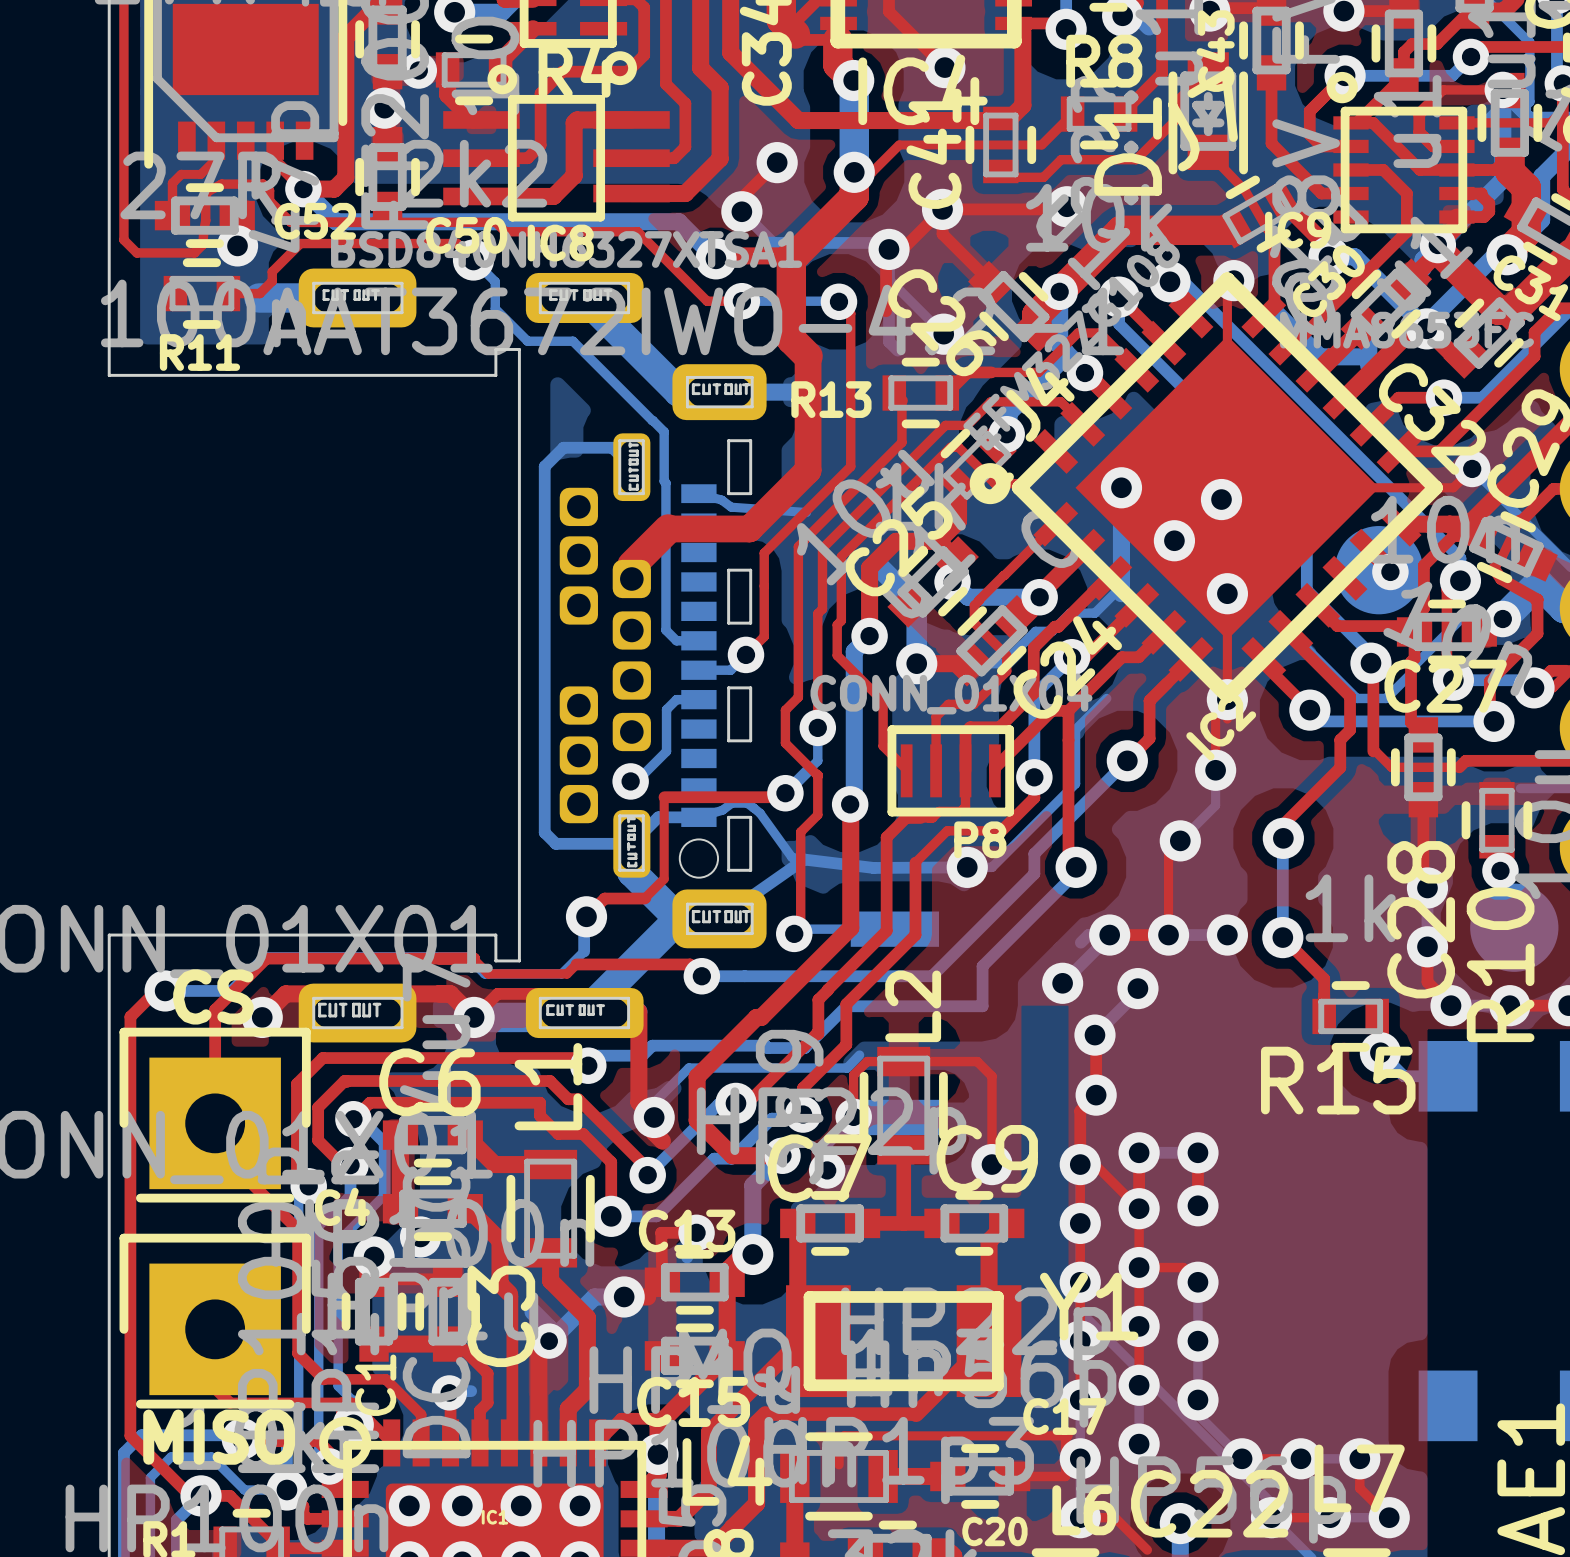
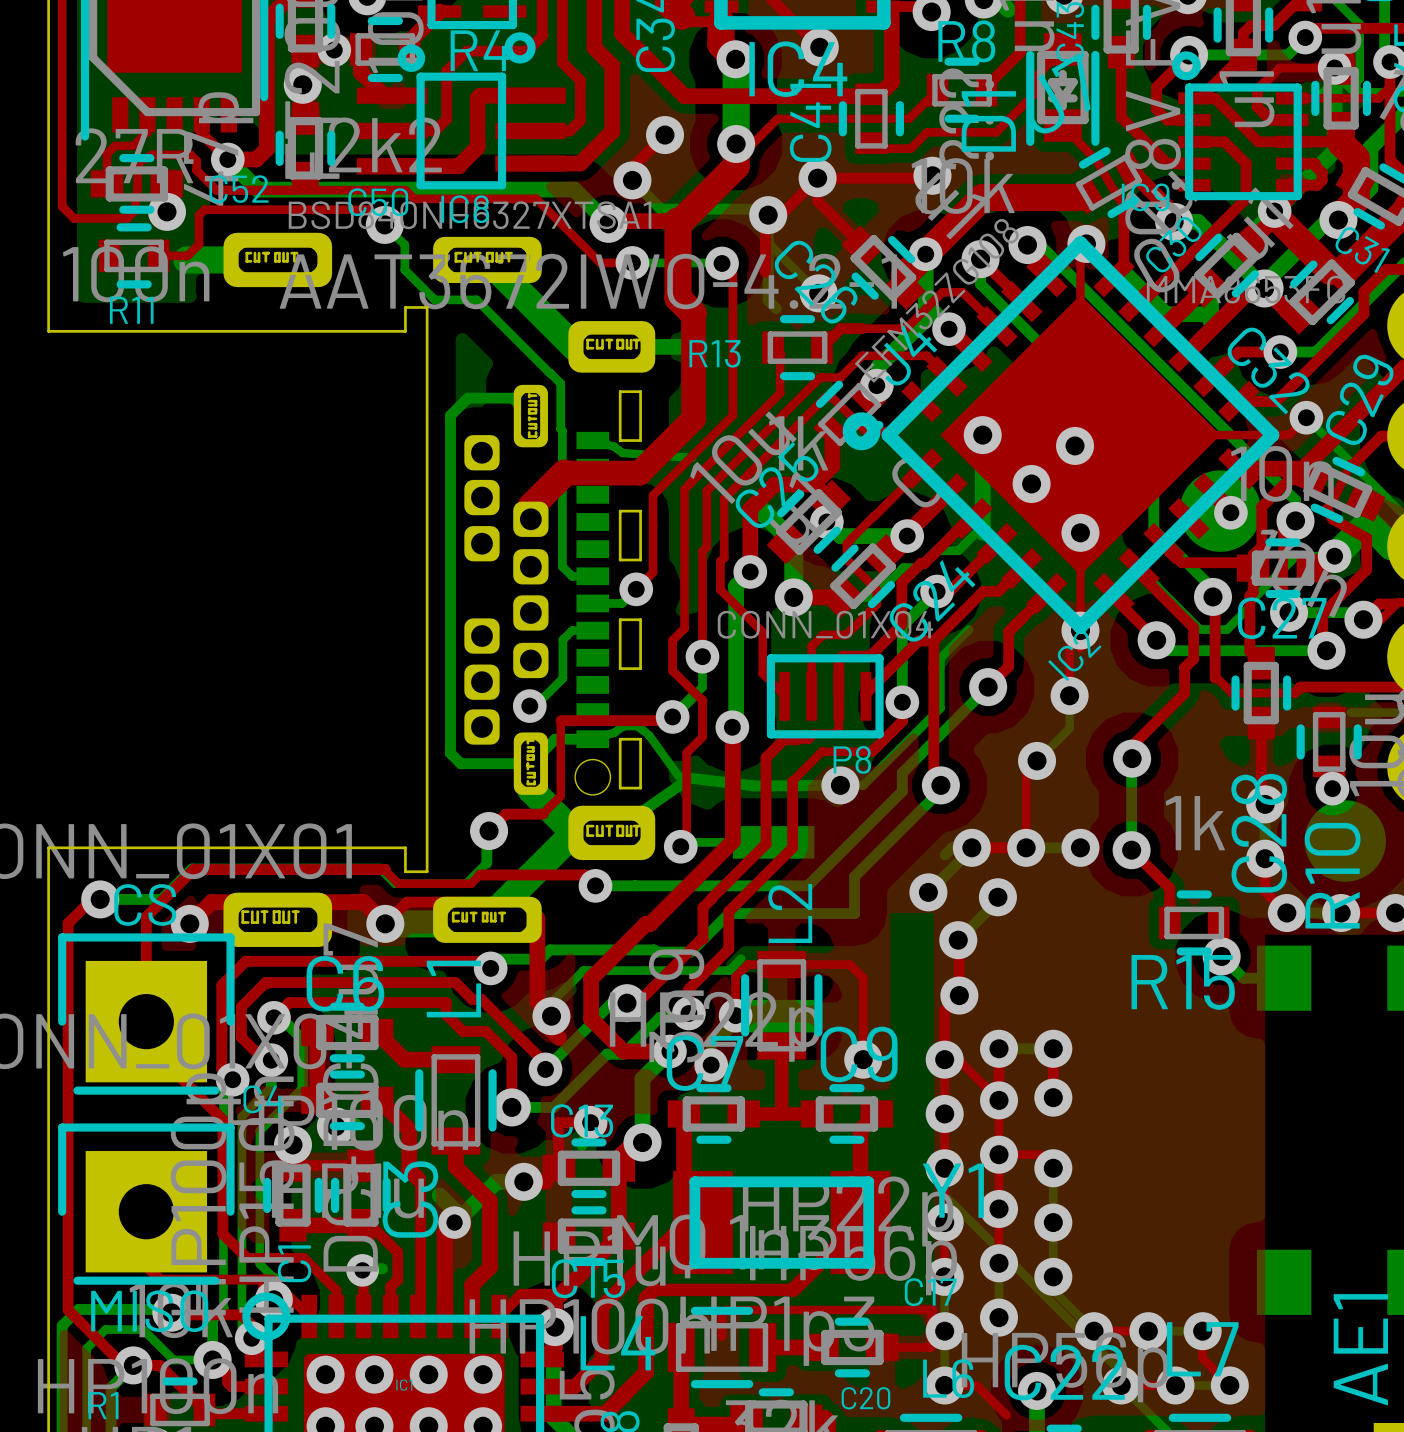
top track: (300, 243) (272, 271) -> (225, 209) (204, 209) (199, 215) (199, 235)

